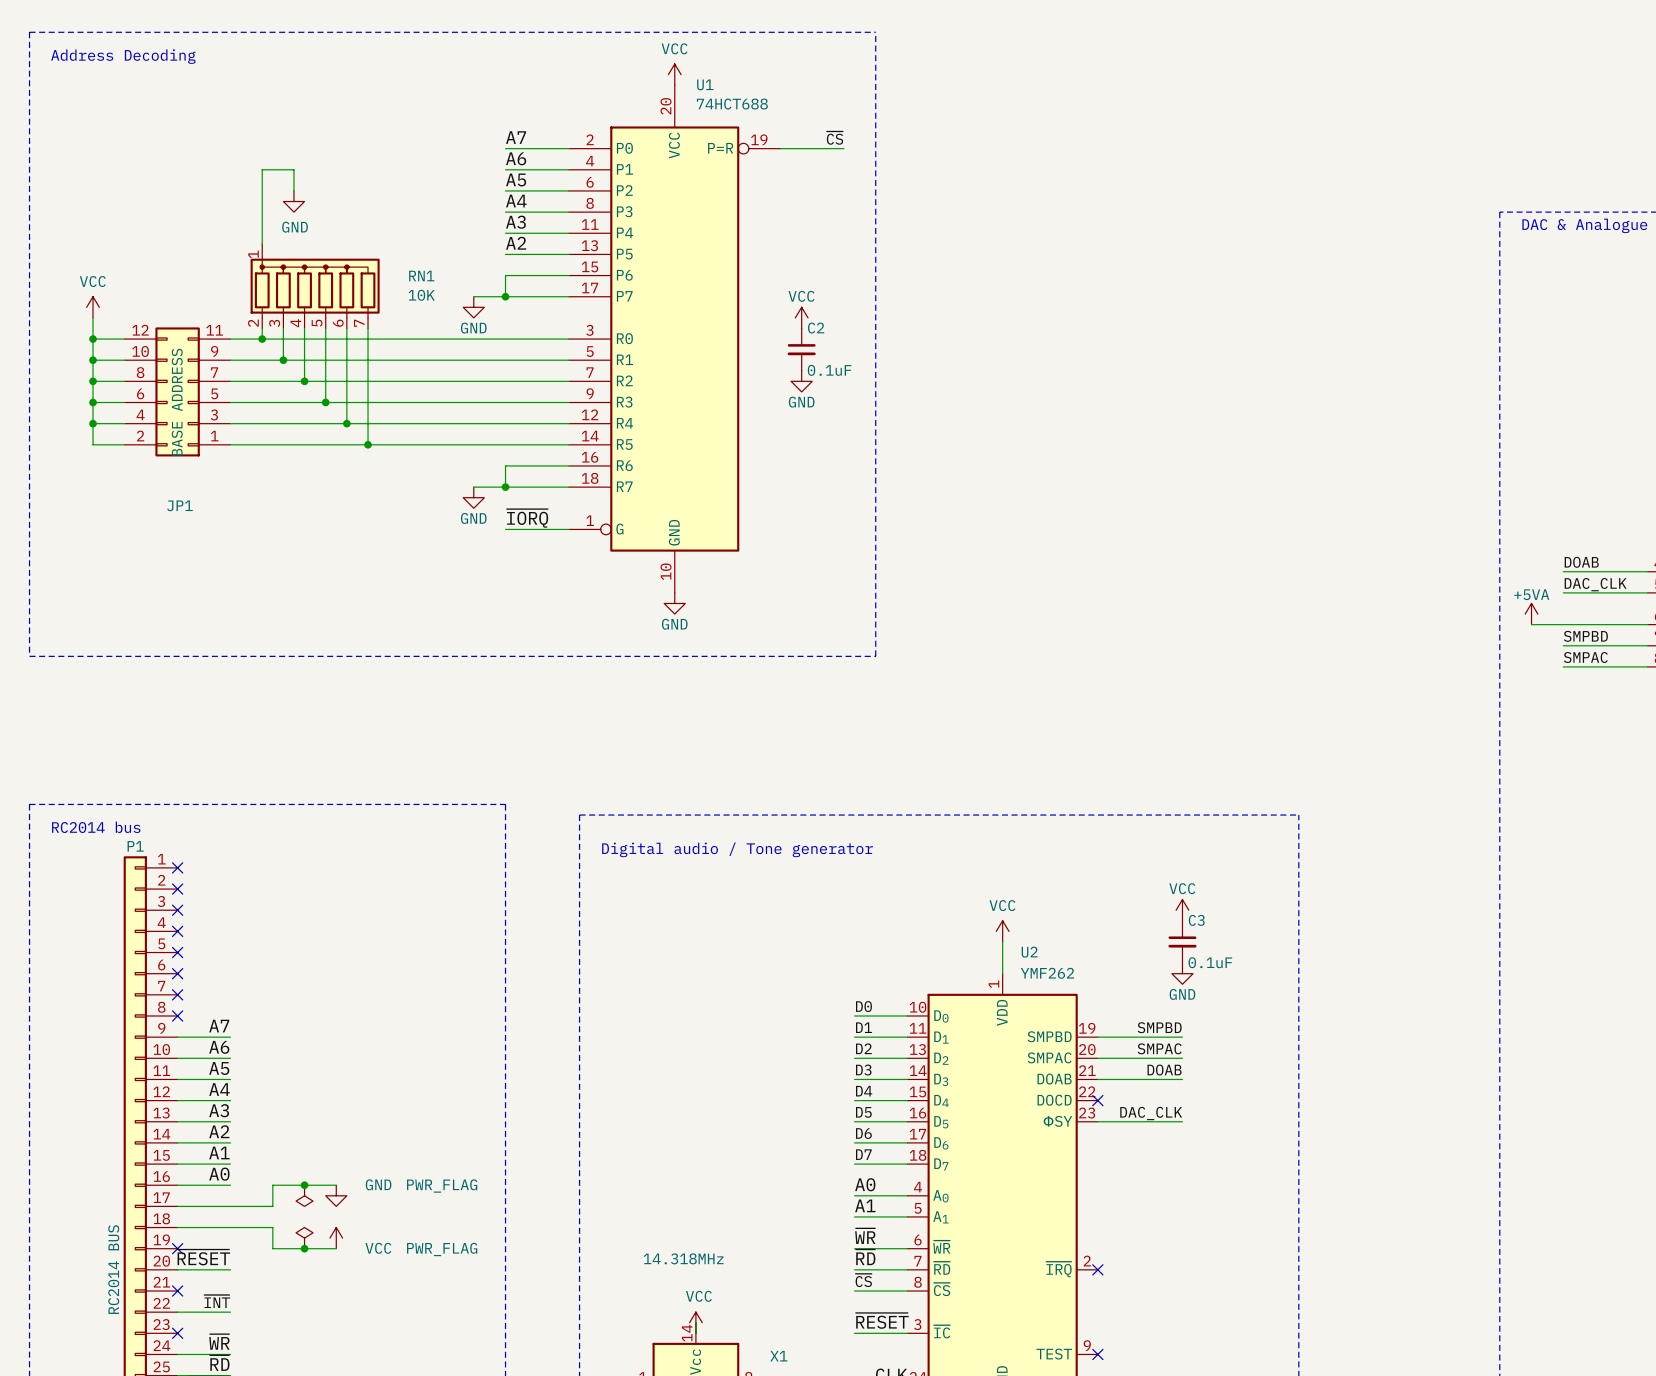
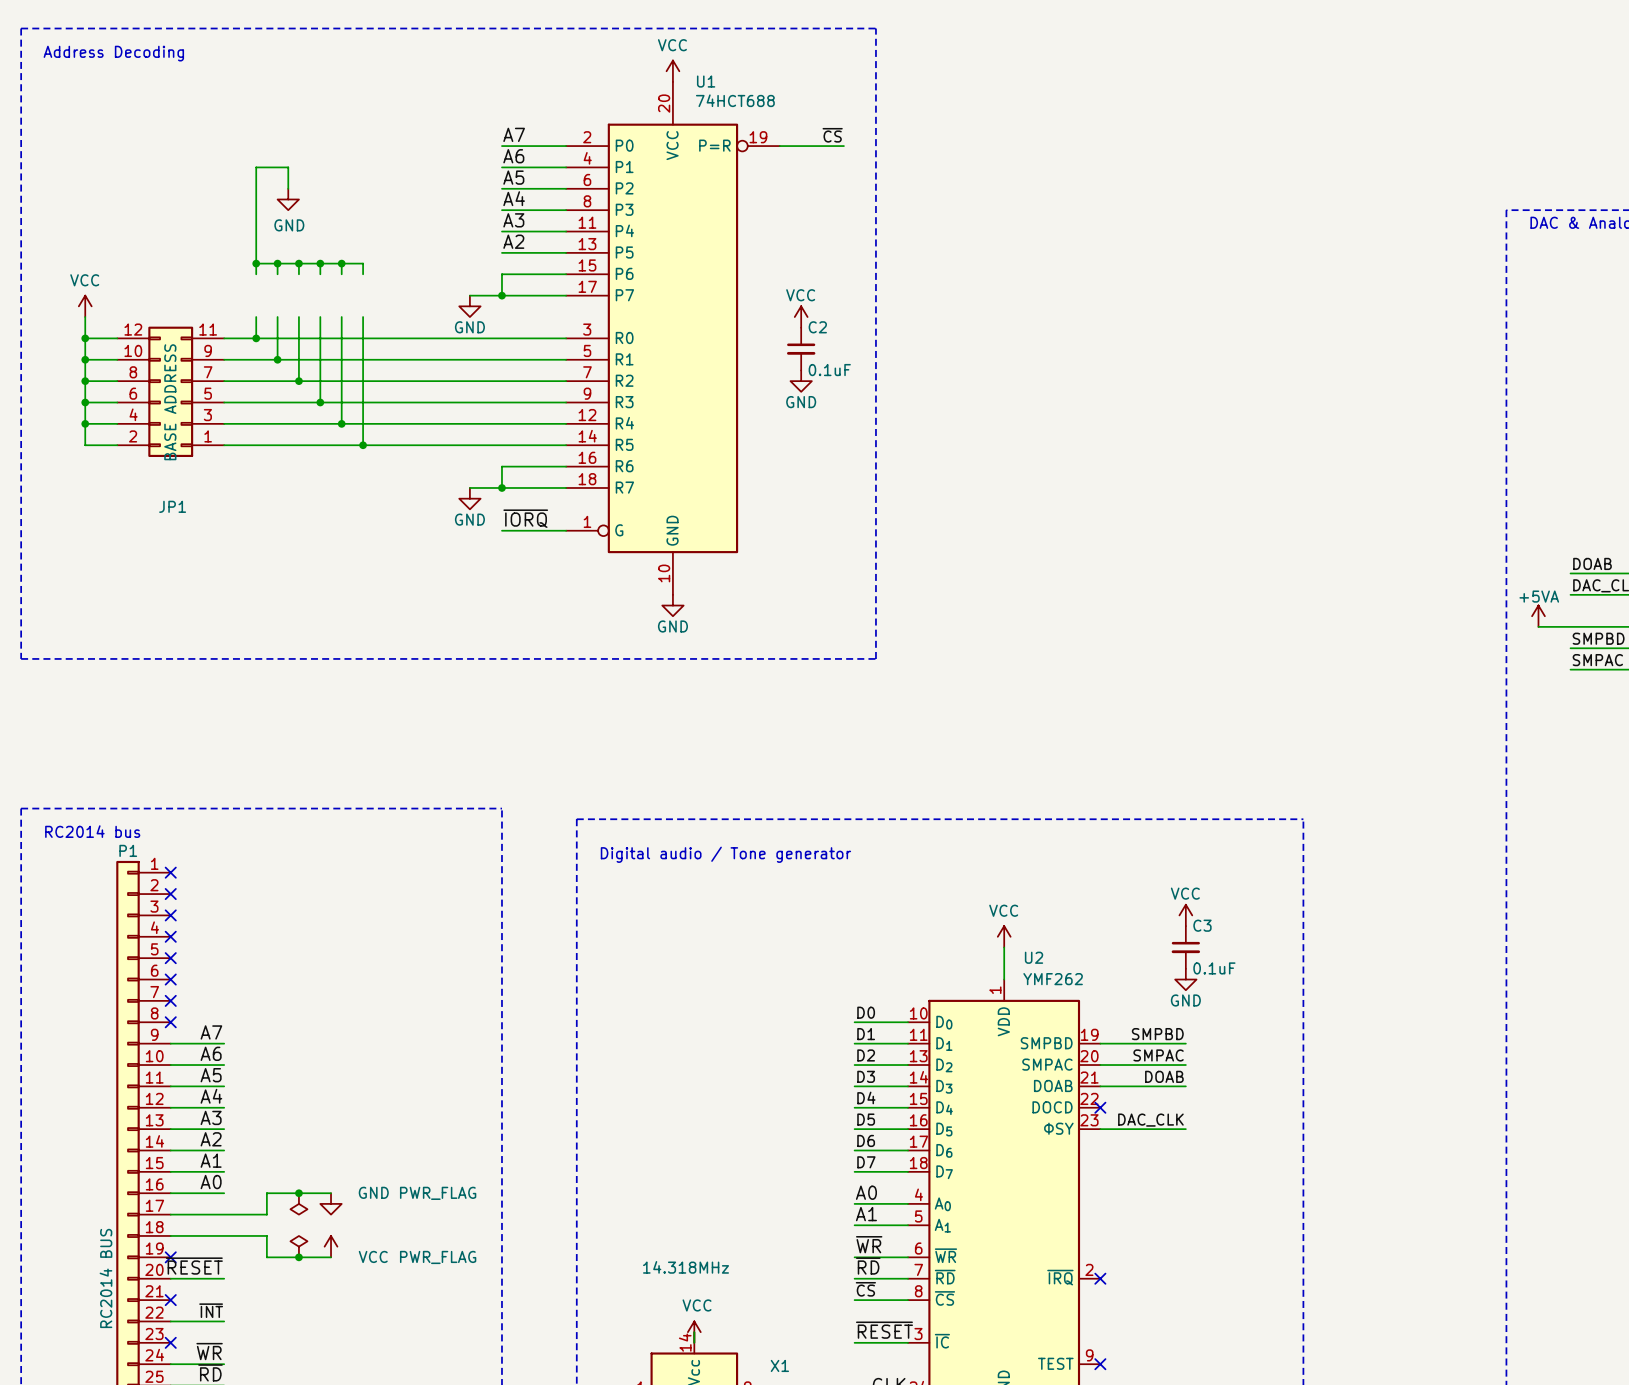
junction: none -> (256, 263)
junction: none -> (277, 263)
junction: none -> (298, 263)
junction: none -> (320, 263)
junction: none -> (341, 263)
RN1: 10K (315, 286) -> none

